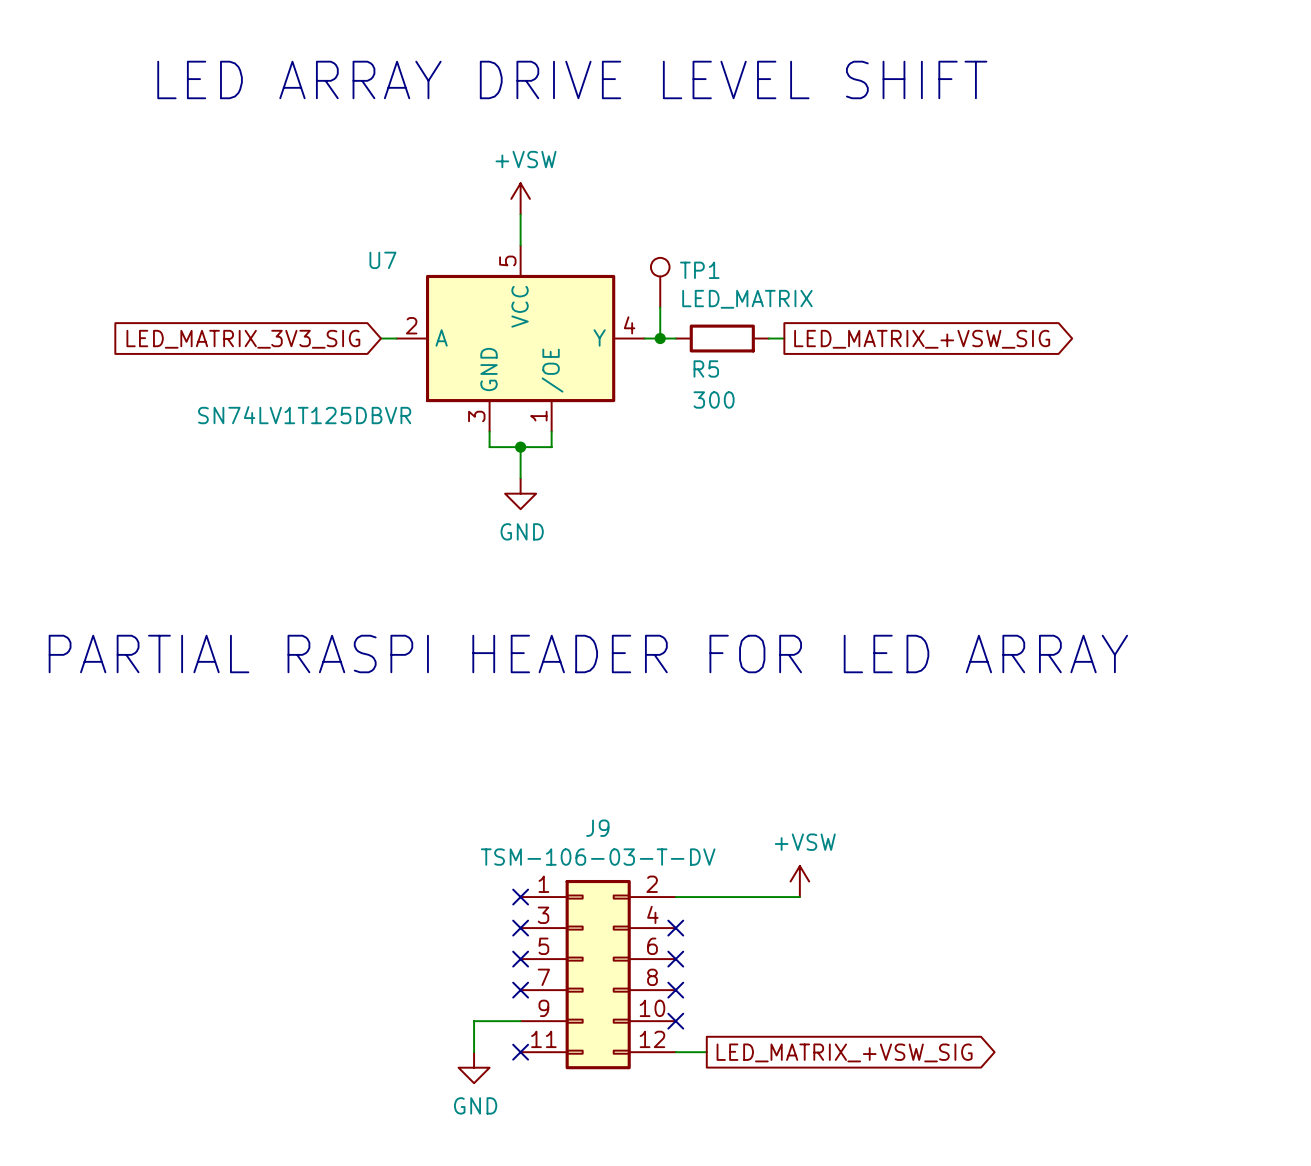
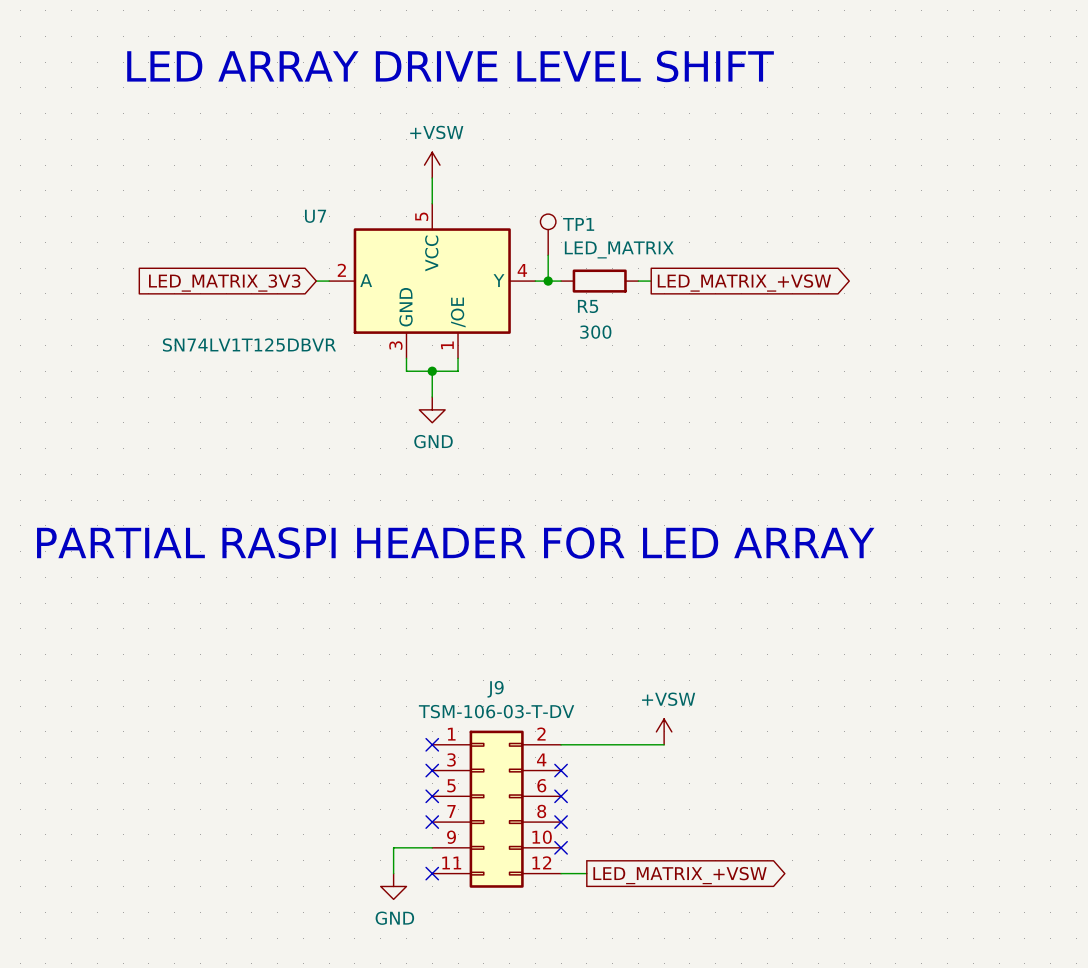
global label: LED_MATRIX_3V3_SIG (243, 339) -> LED_MATRIX_3V3 (224, 283)
global label: LED_MATRIX_+VSW_SIG (922, 339) -> LED_MATRIX_+VSW (744, 283)
global label: LED_MATRIX_+VSW_SIG (844, 1052) -> LED_MATRIX_+VSW (680, 875)

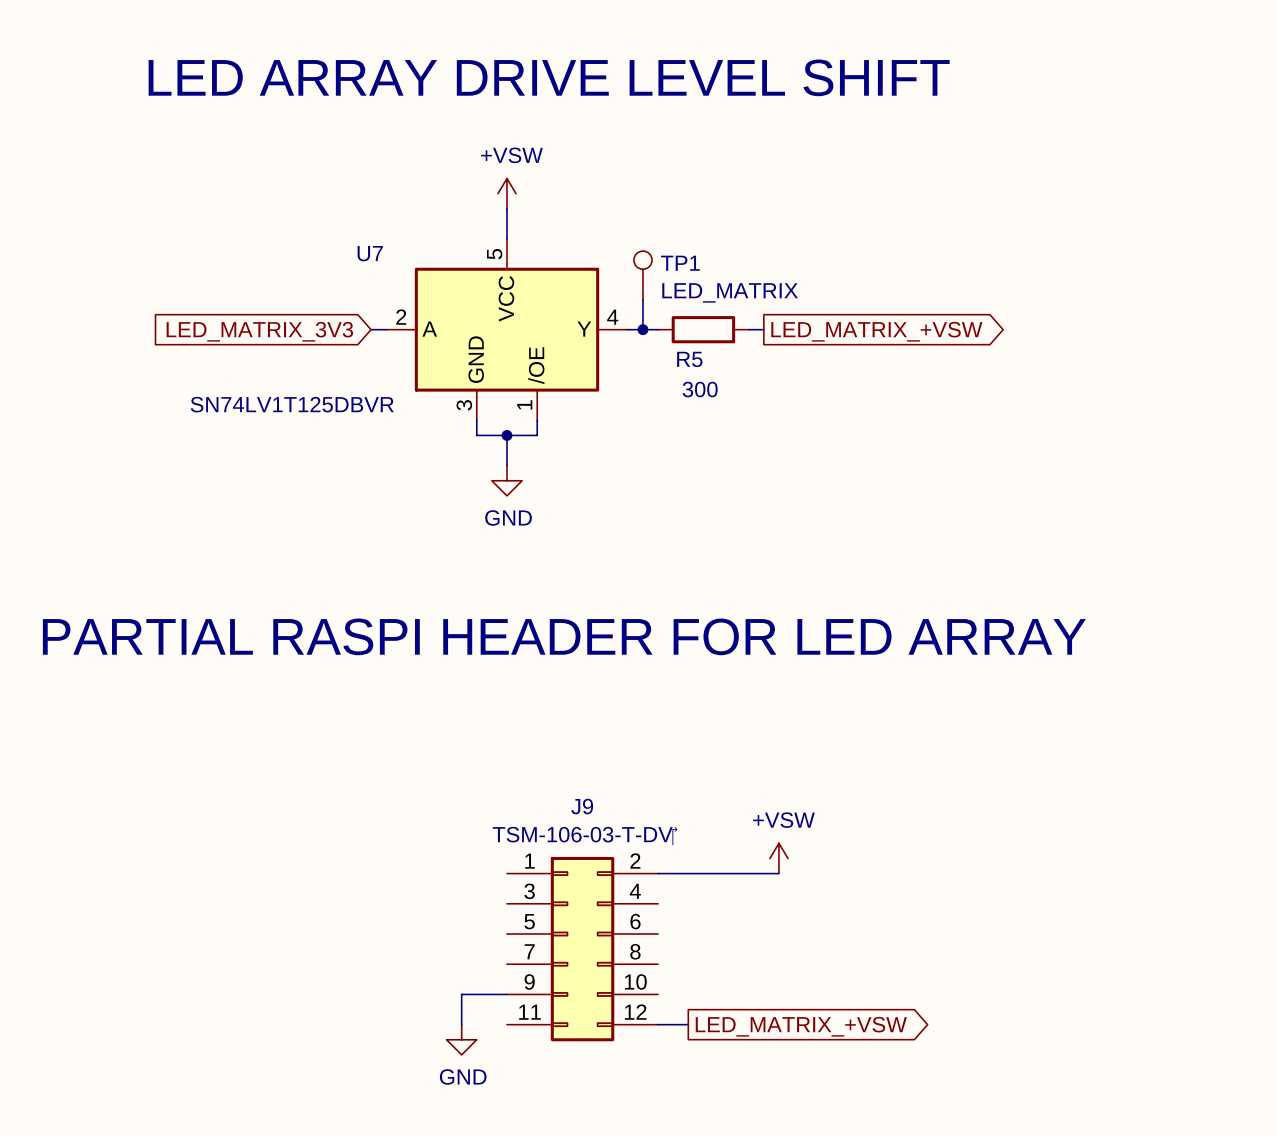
no-connect mark: (432, 744) -> none
no-connect mark: (432, 770) -> none
no-connect mark: (561, 770) -> none
no-connect mark: (432, 796) -> none
no-connect mark: (561, 796) -> none
no-connect mark: (432, 822) -> none
no-connect mark: (561, 822) -> none
no-connect mark: (561, 847) -> none
no-connect mark: (432, 873) -> none

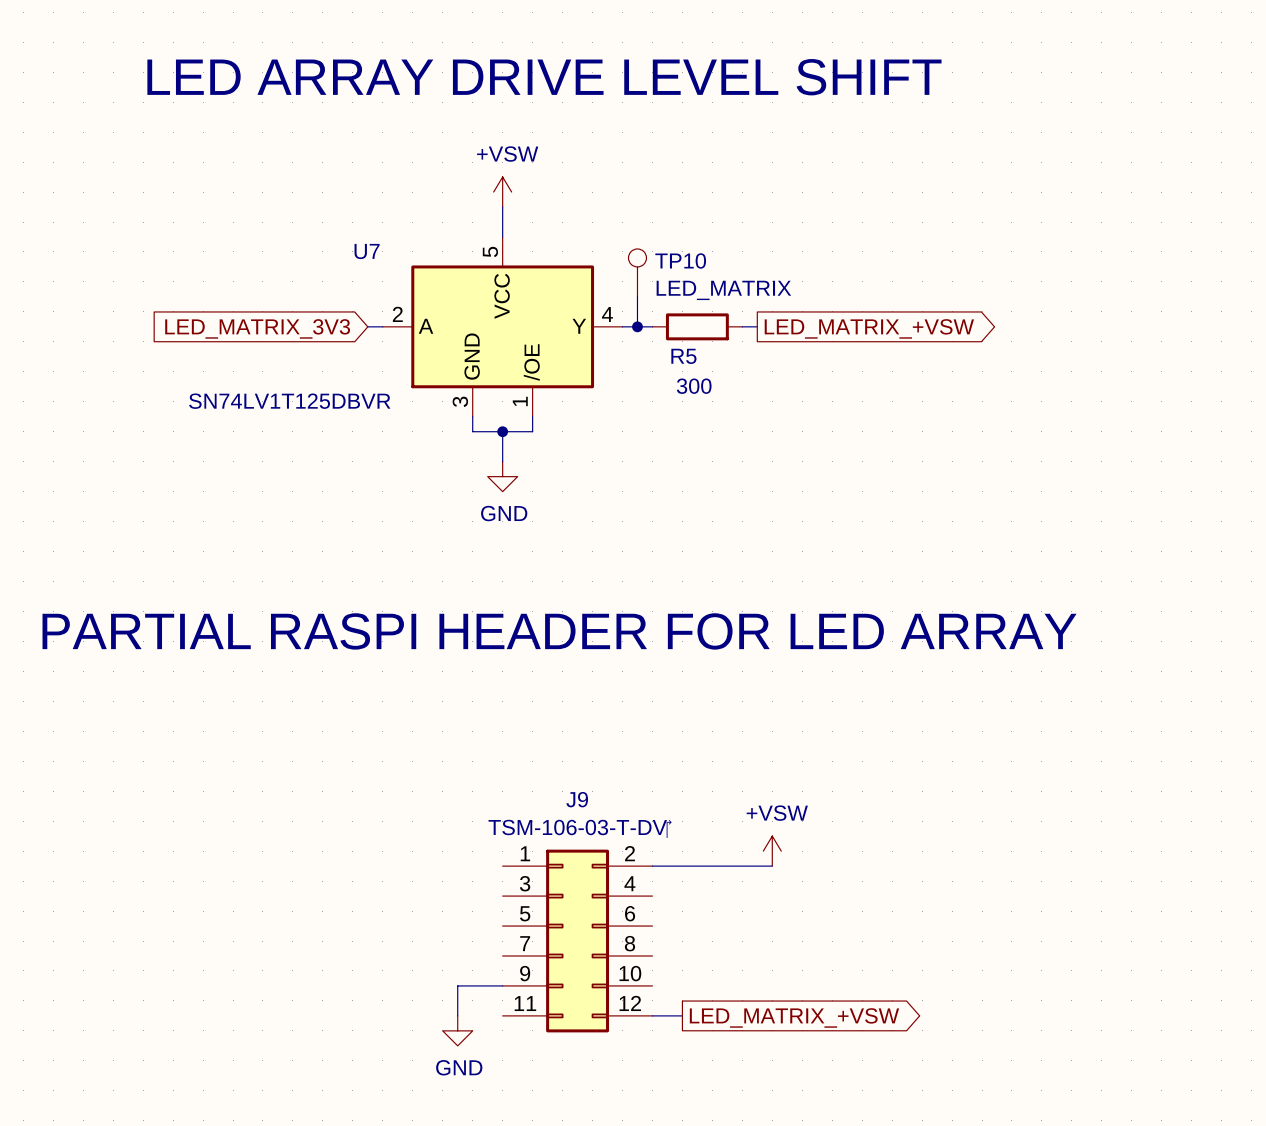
TP1 name: TP1 (680, 263) -> TP10 (680, 260)

